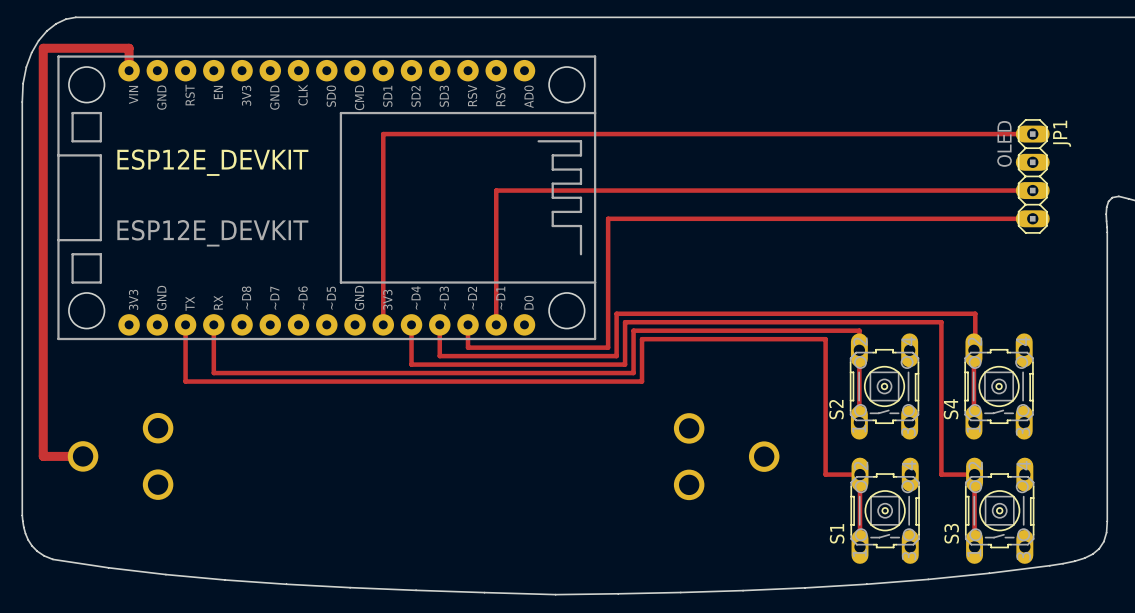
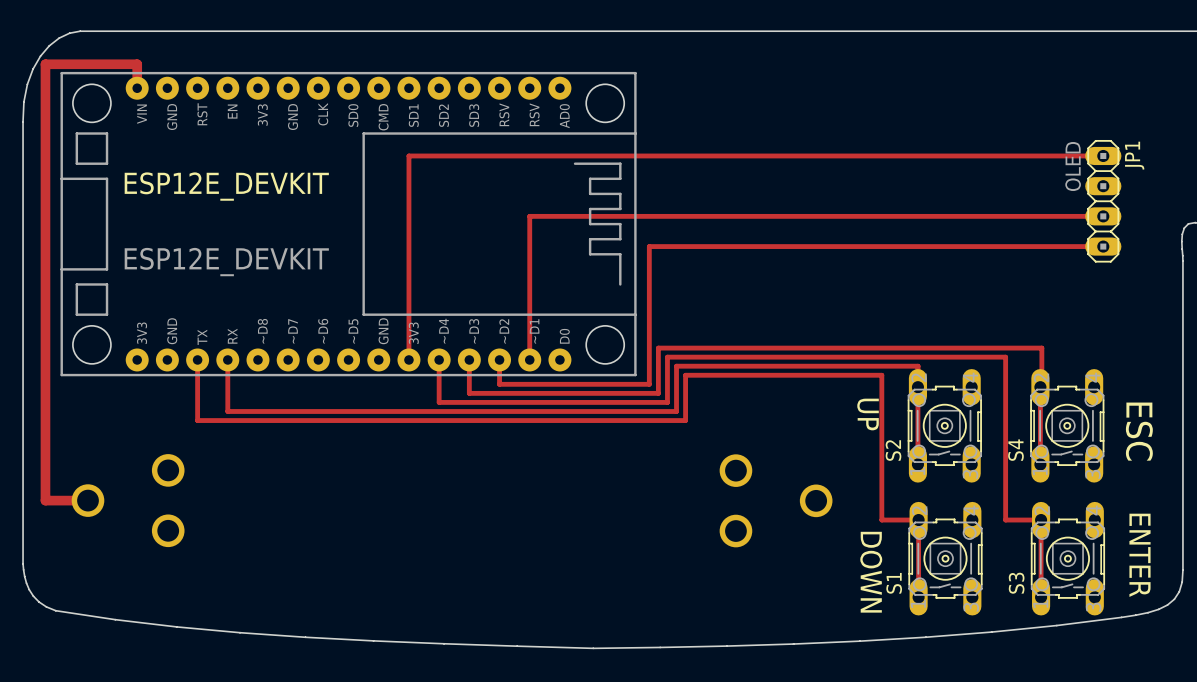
text: none -> UP (868, 414)
text: none -> ESC (1139, 431)
text: none -> ENTER (1139, 555)
text: none -> DOWN (871, 572)

